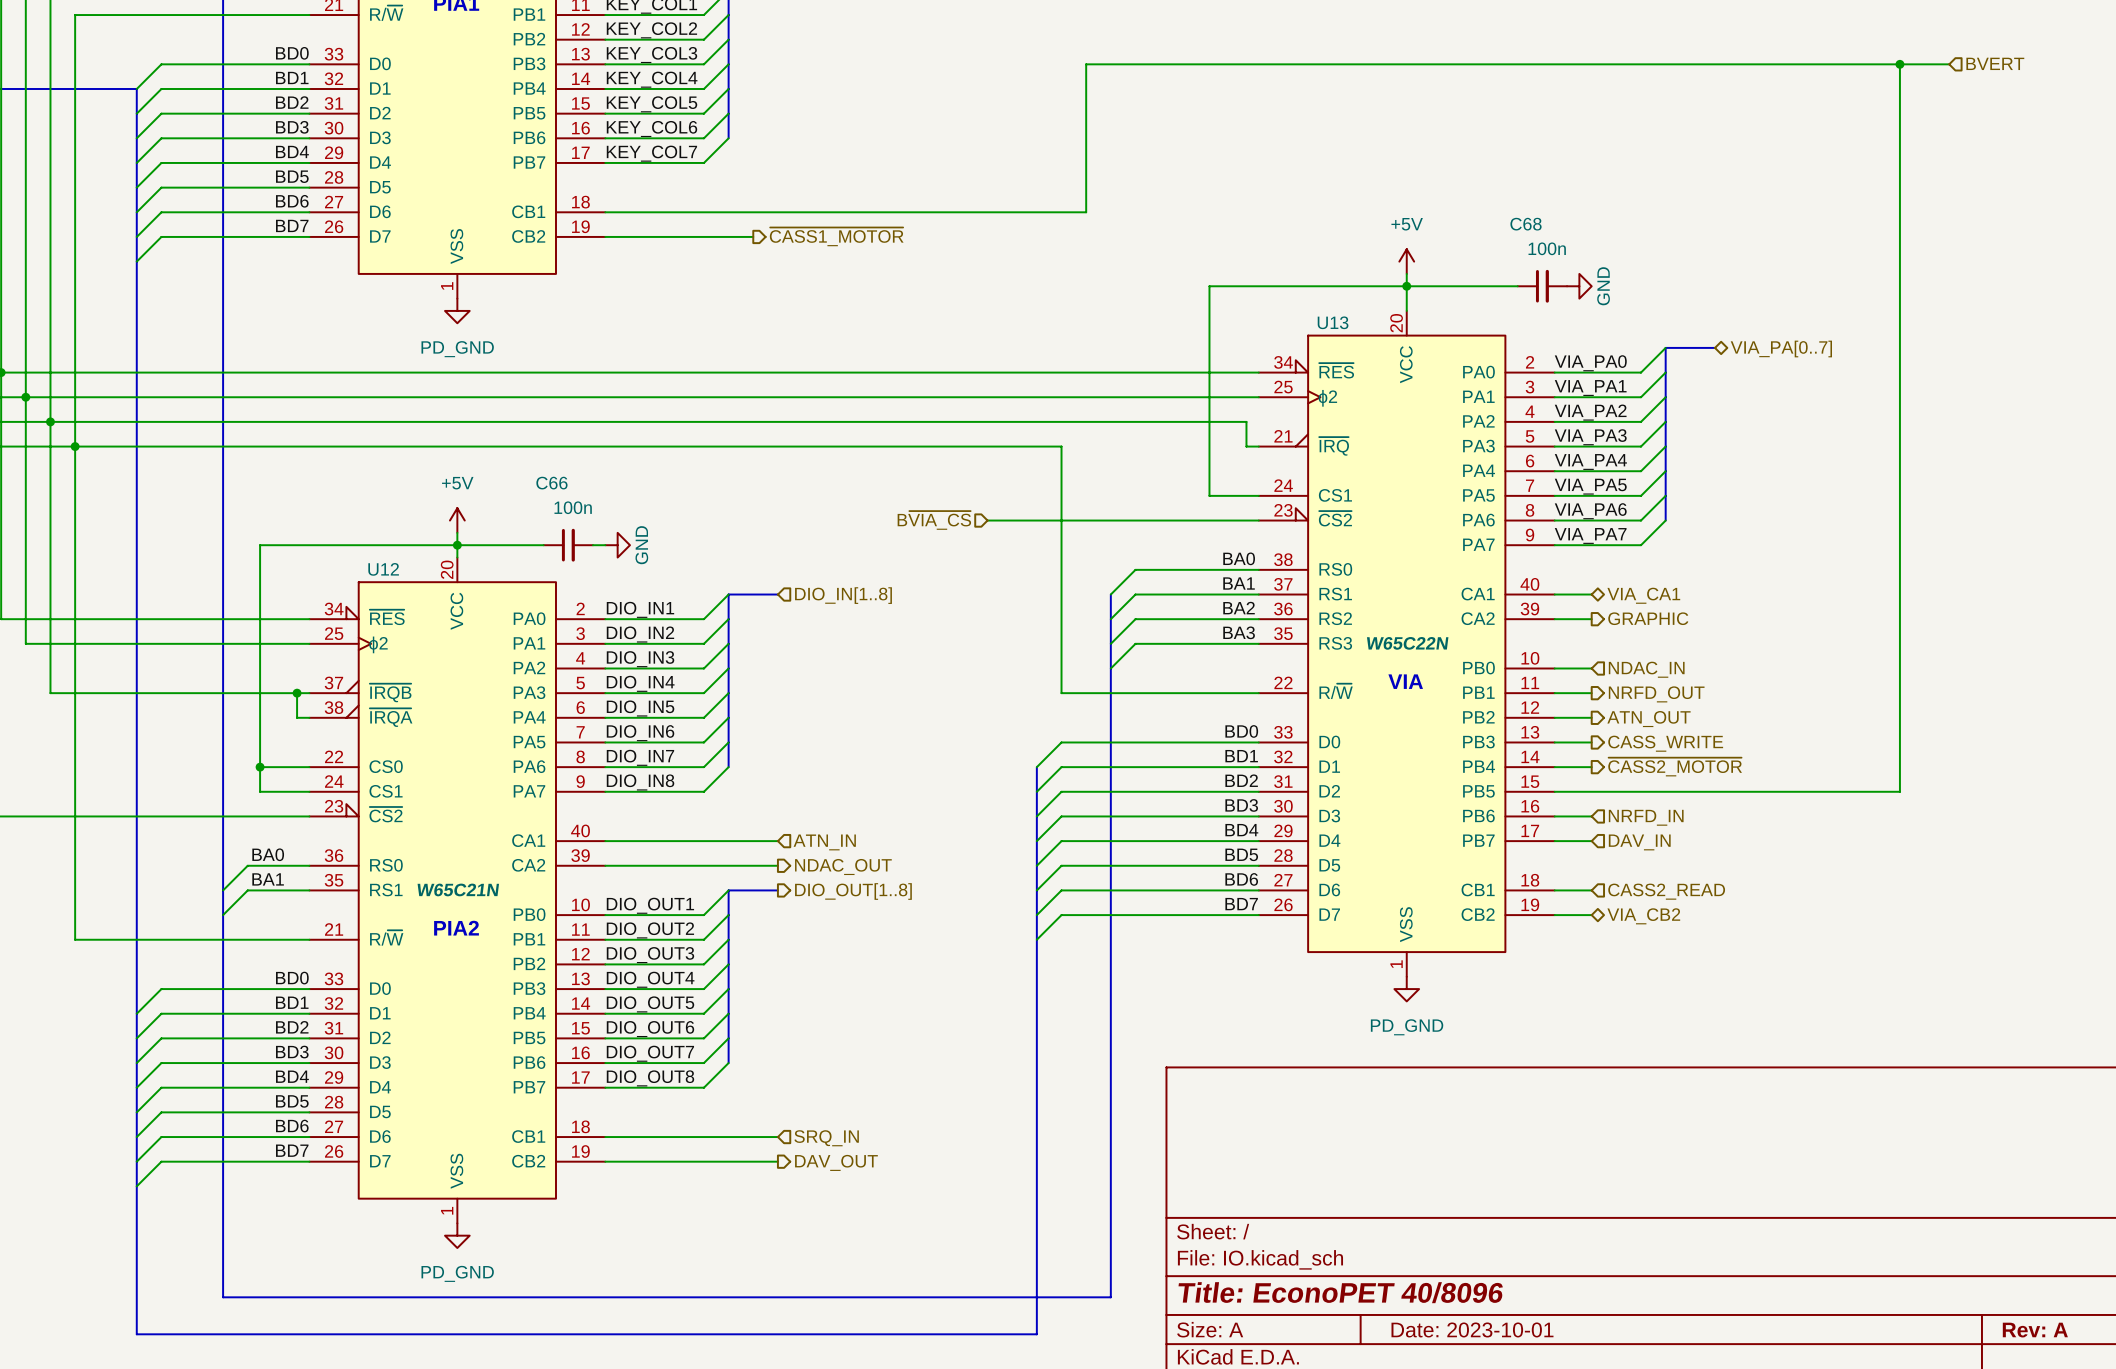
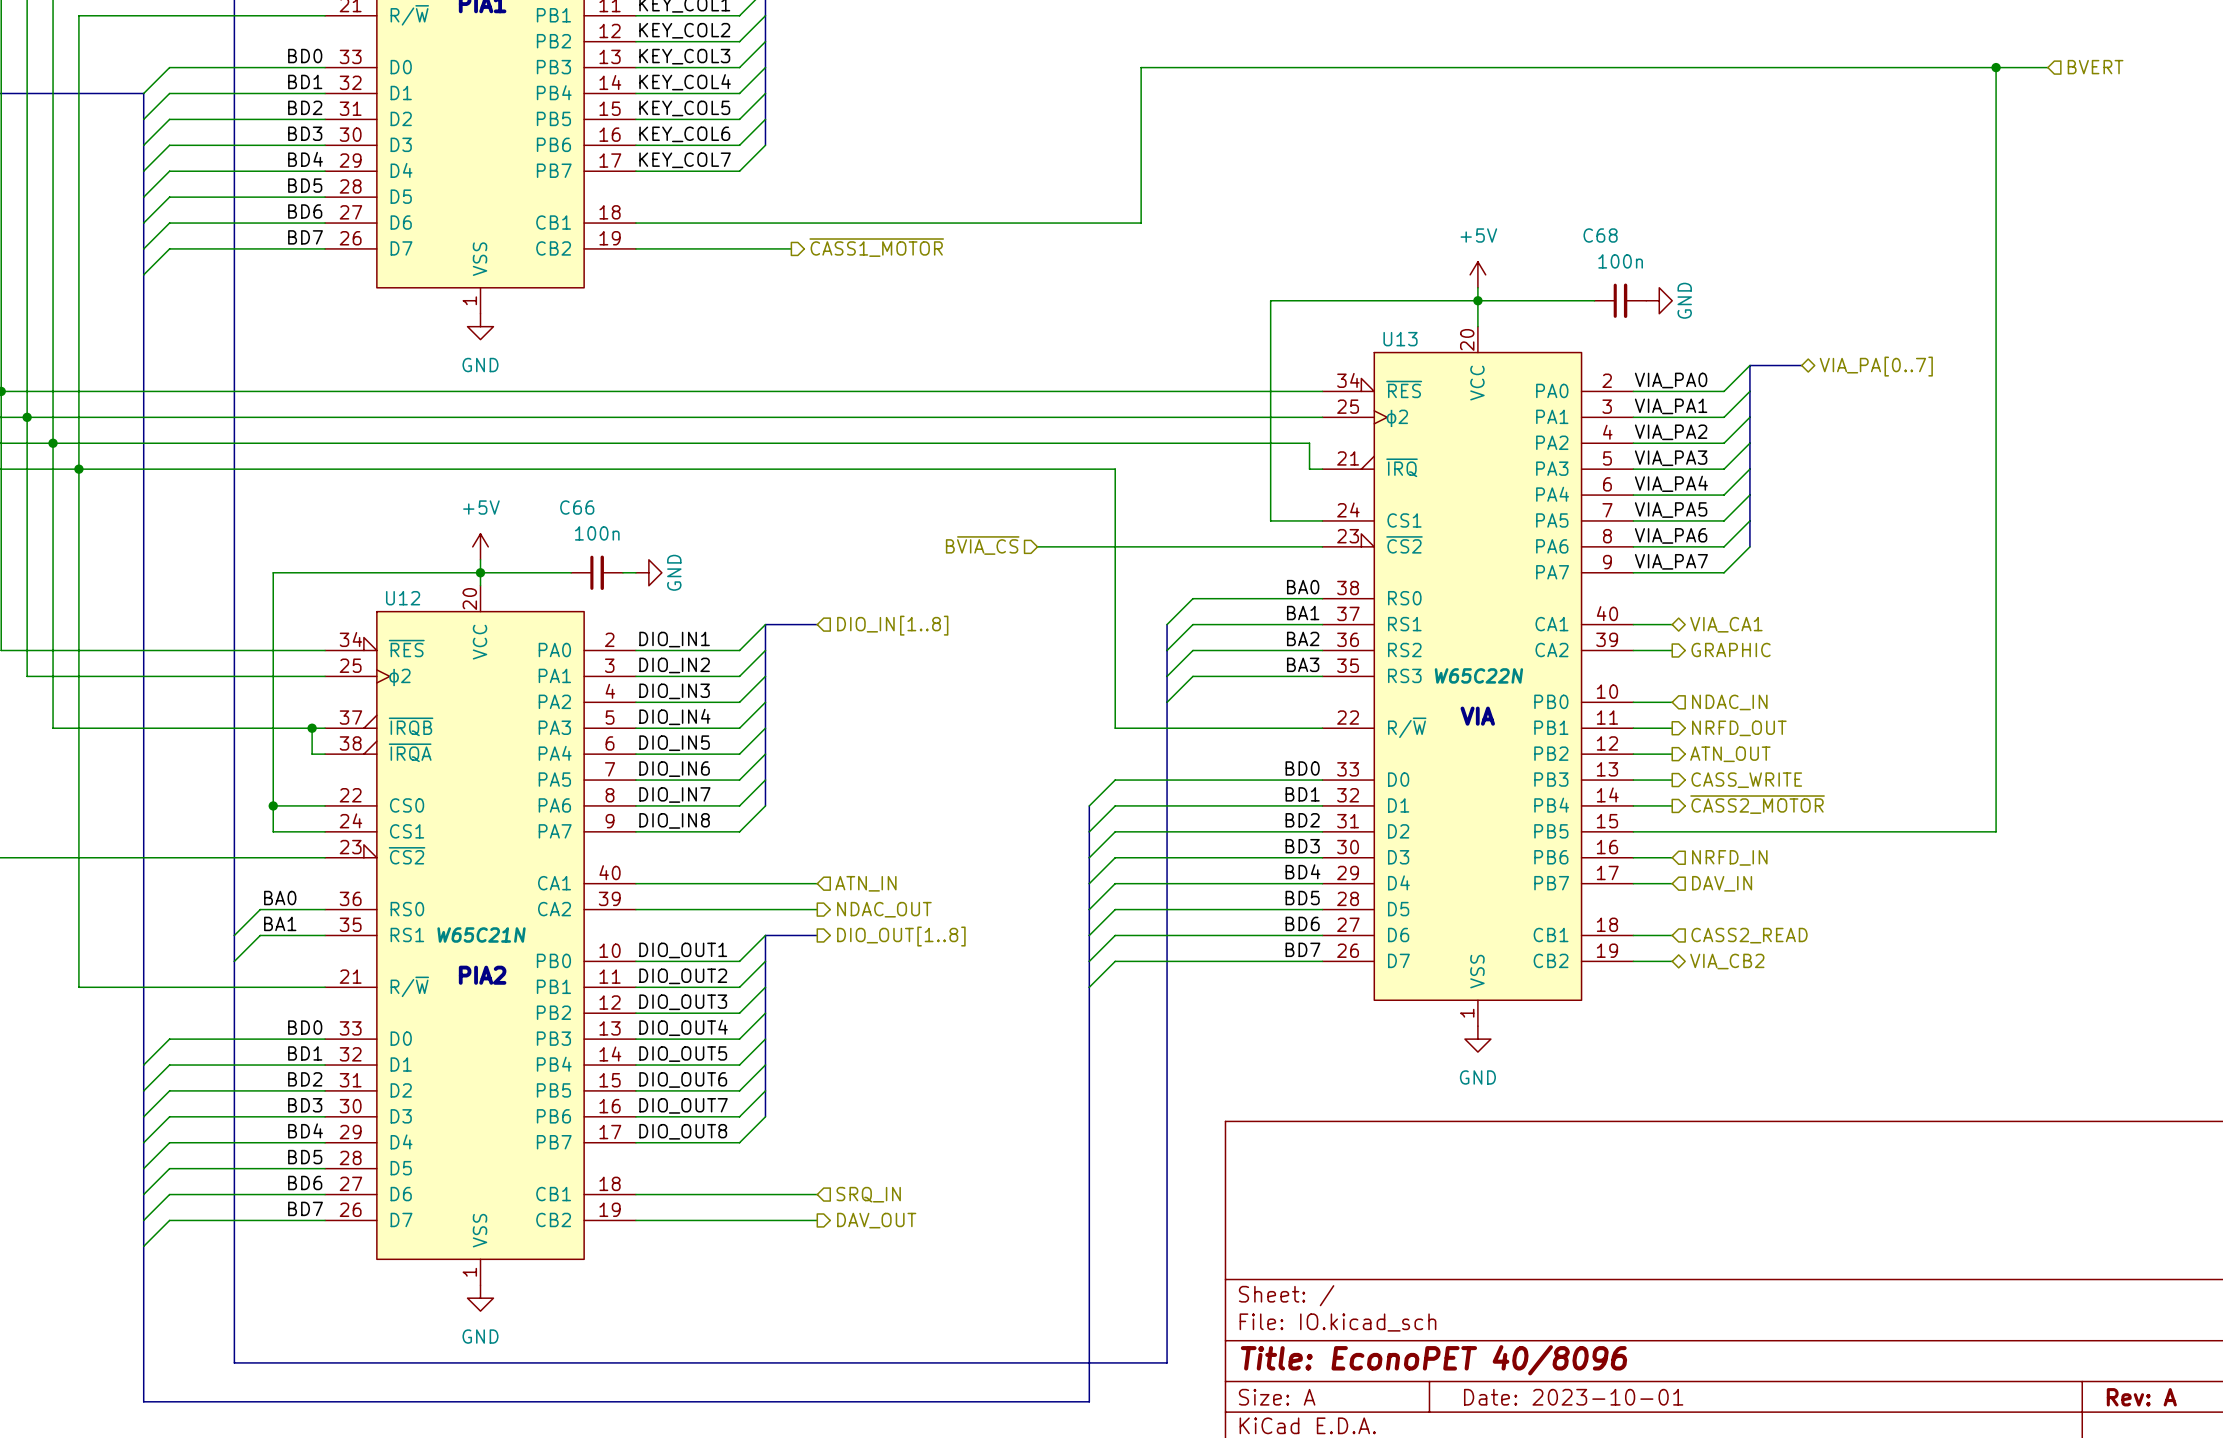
power symbol: PD_GND (457, 310) -> GND (480, 326)
power symbol: PD_GND (1406, 989) -> GND (1477, 1039)
power symbol: PD_GND (457, 1235) -> GND (480, 1298)

